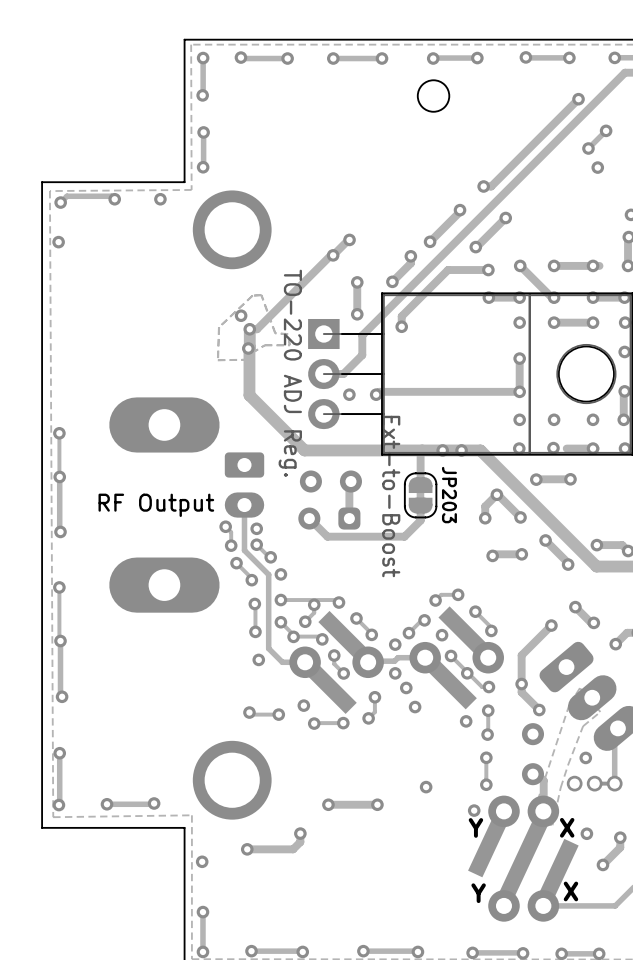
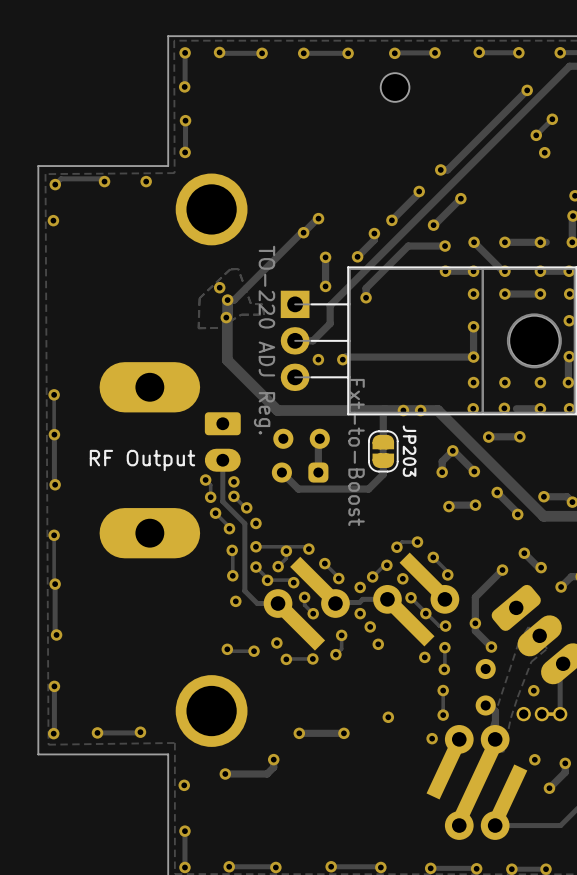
text: Y (475, 827) -> none
text: X (567, 827) -> none
text: X (570, 891) -> none
text: Y (478, 893) -> none

